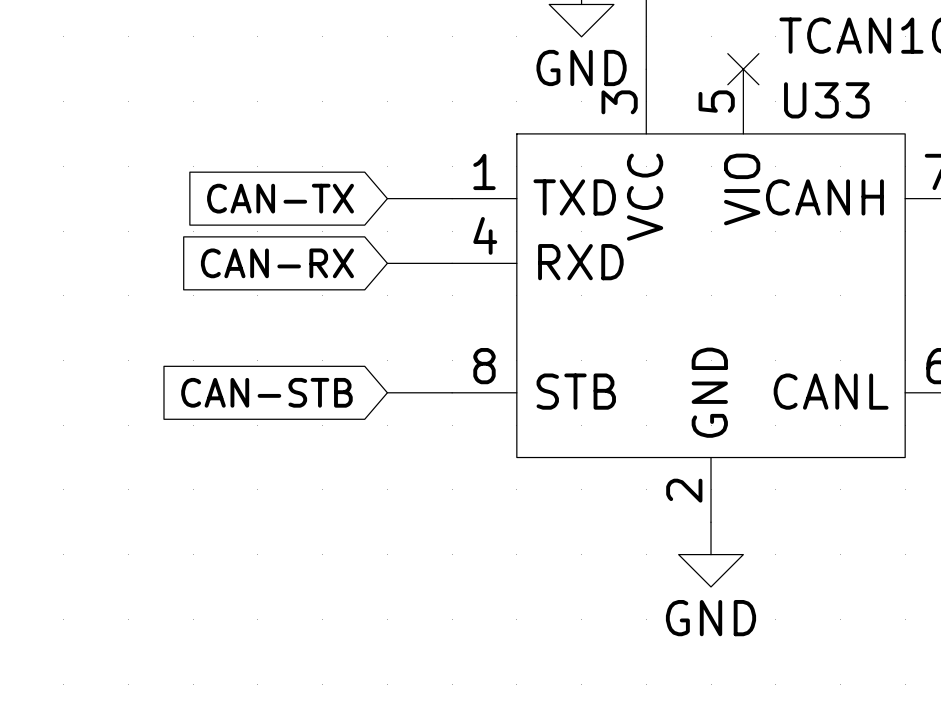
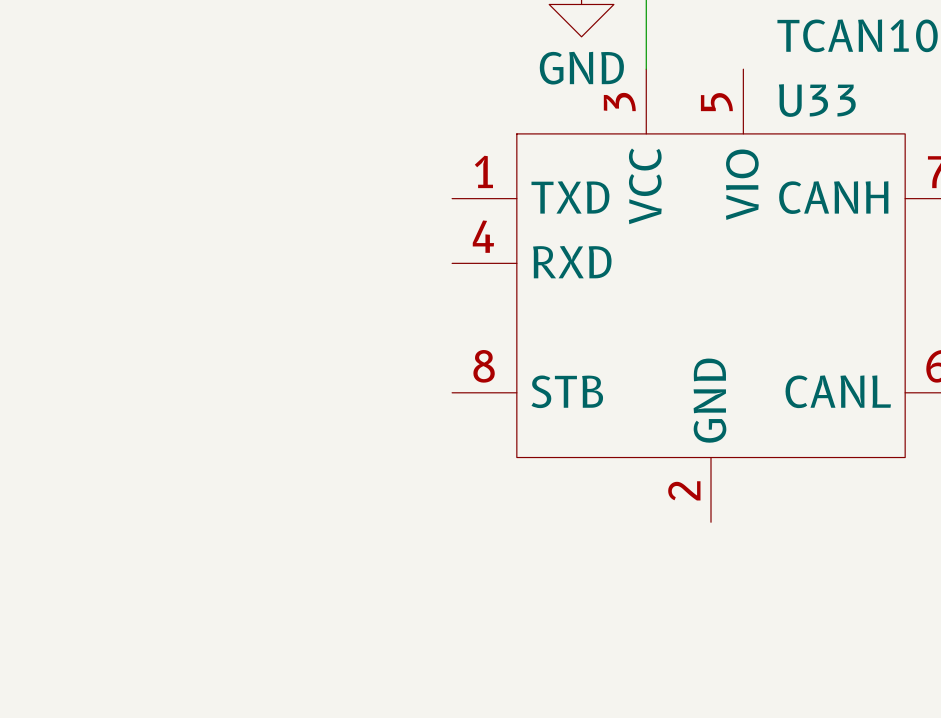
no-connect mark: (743, 69) -> none
global label: CAN-TX (280, 198) -> none
wire: (387, 198) (452, 198) -> none
global label: CAN-RX (277, 263) -> none
wire: (387, 263) (452, 263) -> none
global label: CAN-STB (266, 392) -> none
wire: (387, 392) (452, 392) -> none
power symbol: GND (711, 554) -> none

